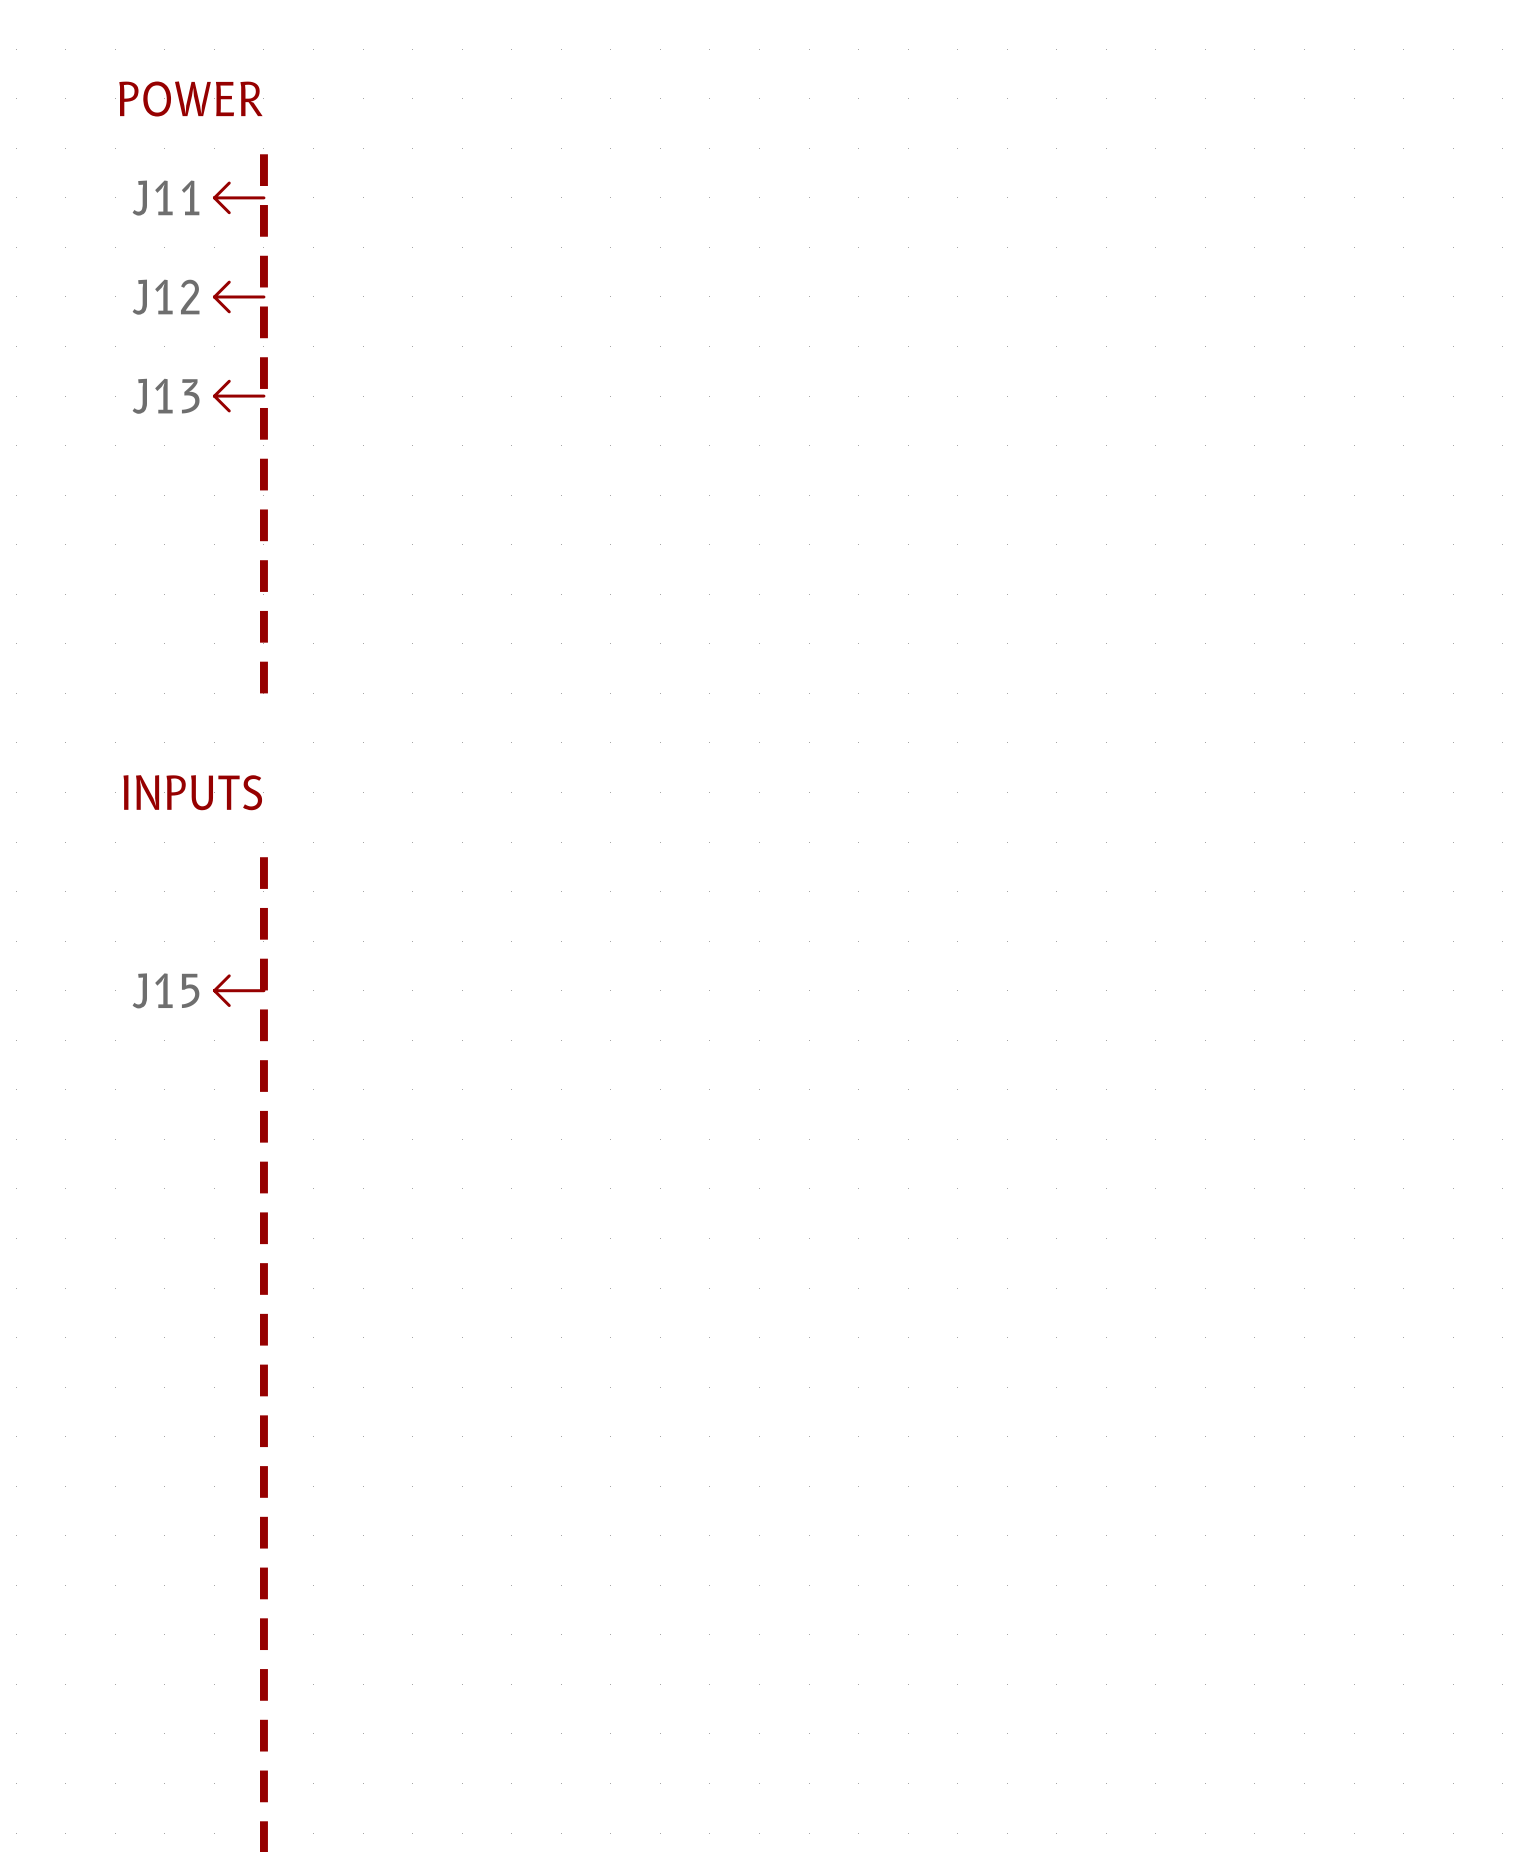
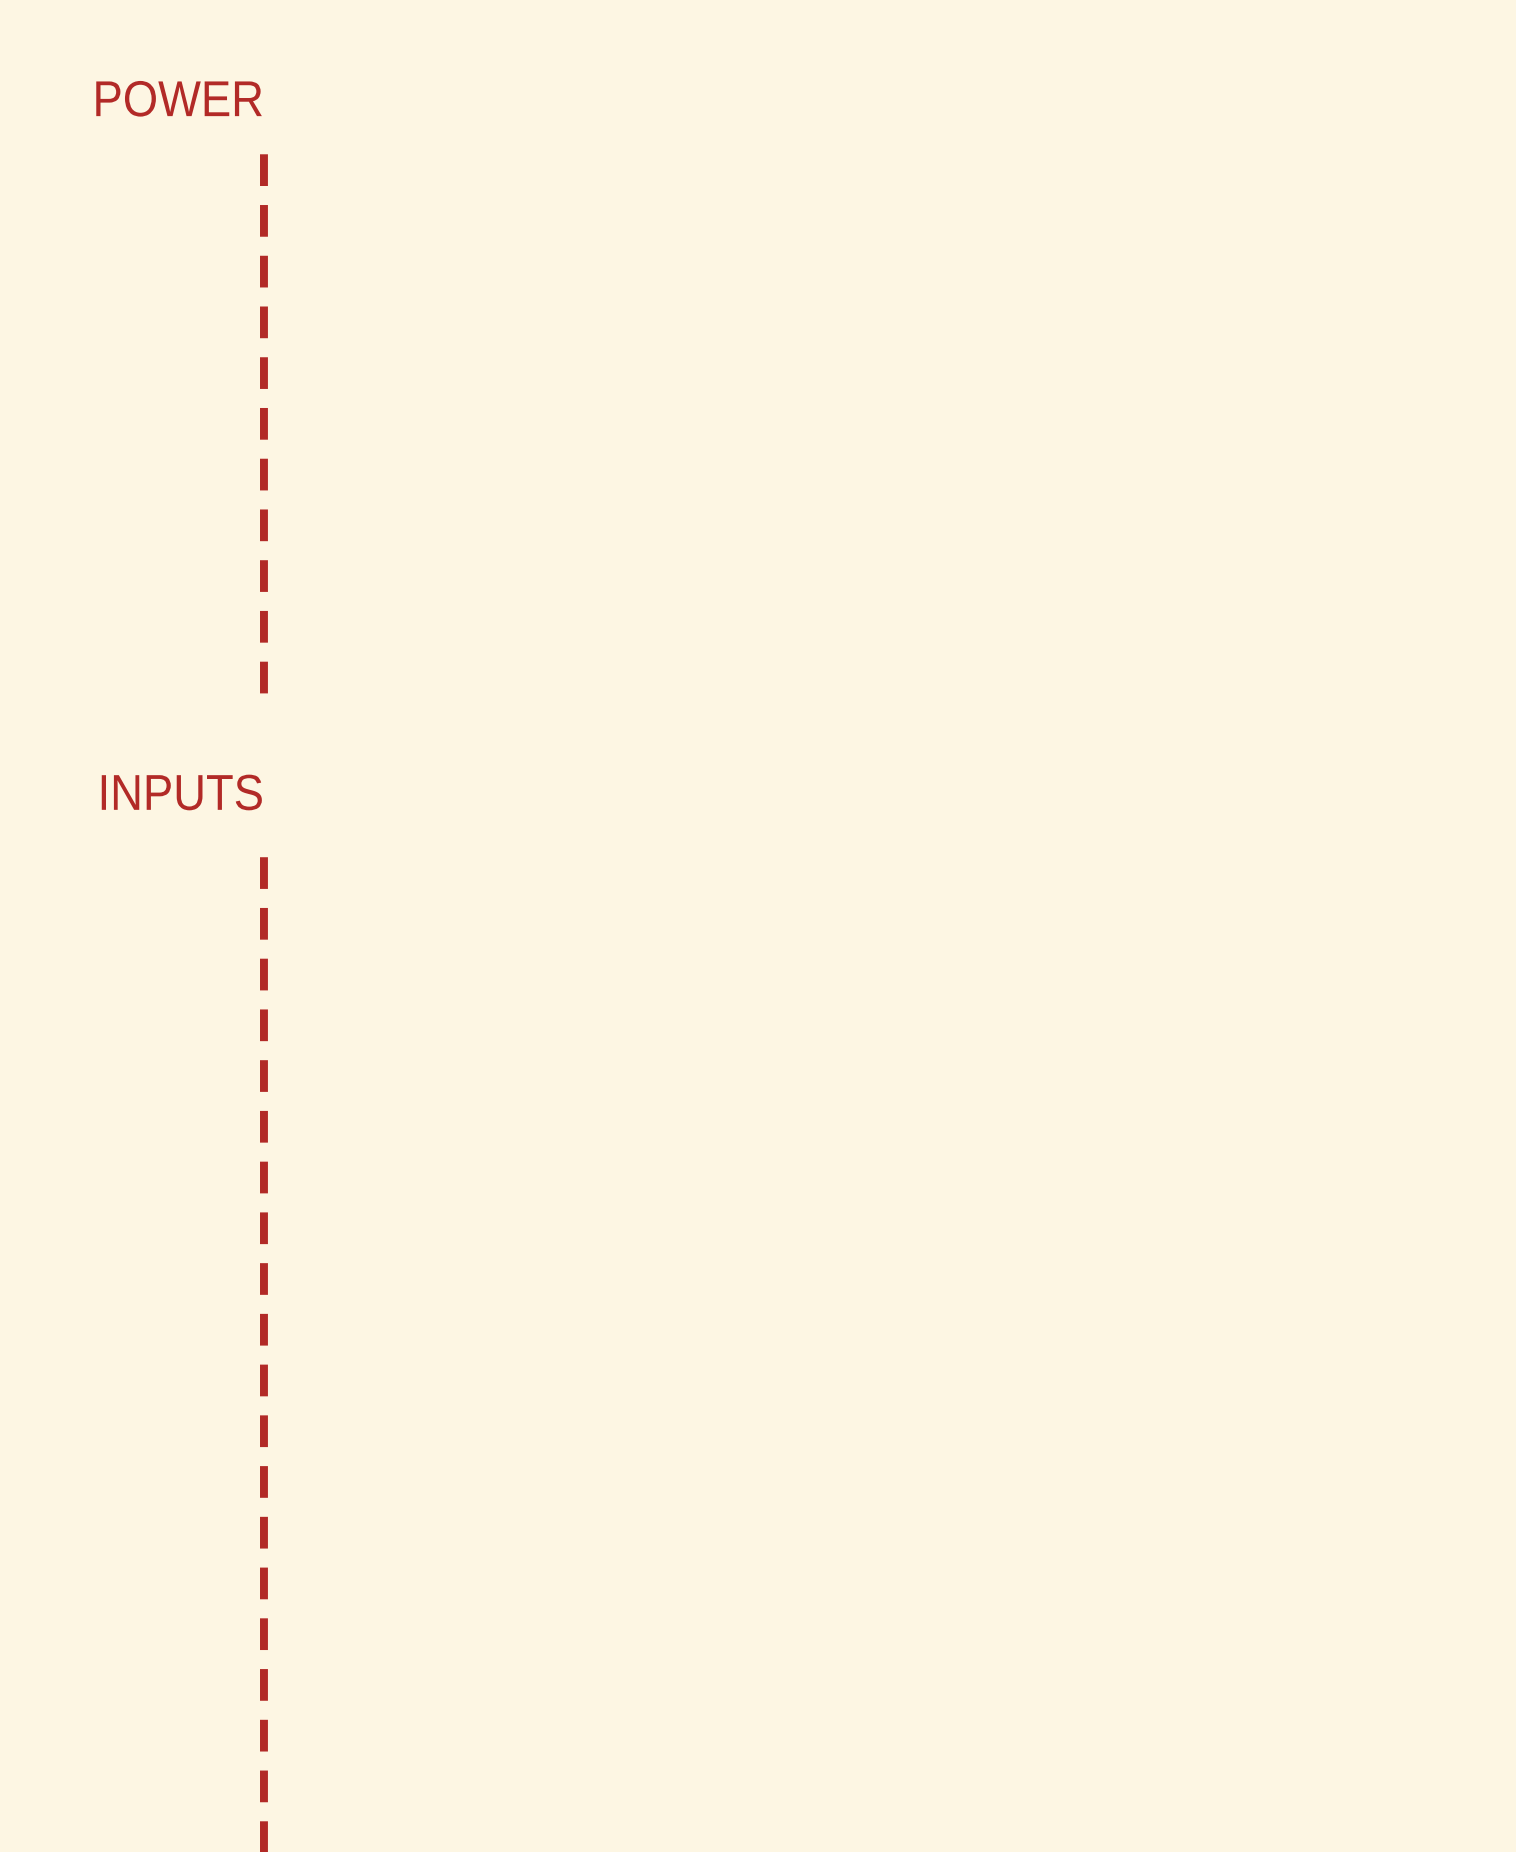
J11: (239, 197) -> none
J12: (239, 296) -> none
J13: (239, 396) -> none
J15: (239, 990) -> none

